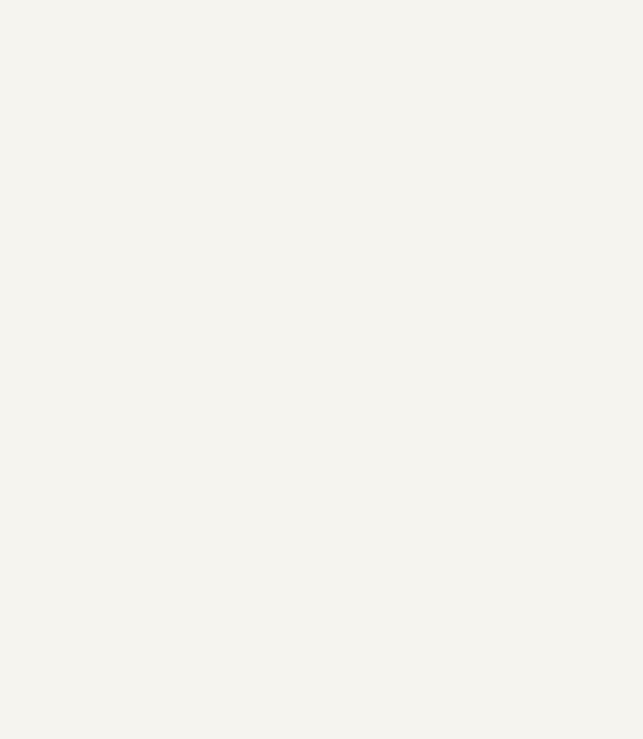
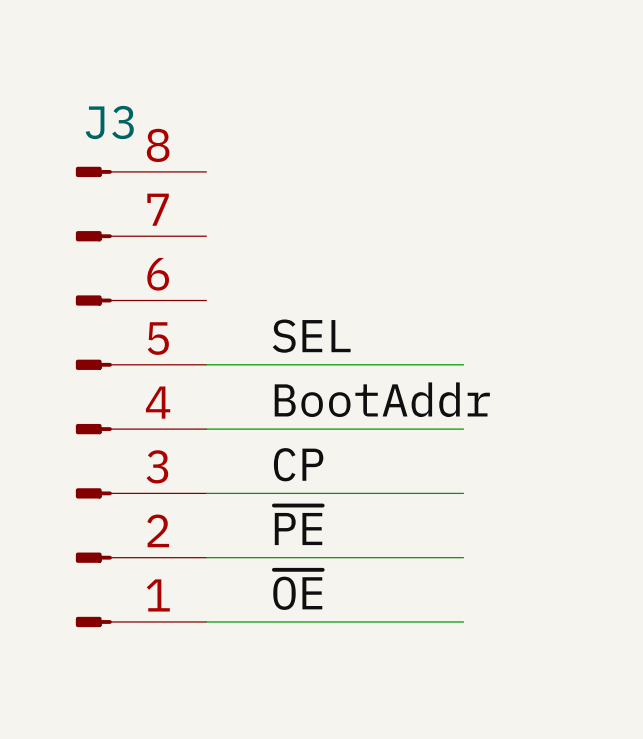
label: none -> SEL (311, 336)
wire: none -> (206, 364) (463, 364)
J3: none -> (141, 396)
label: none -> BootAddr (382, 399)
wire: none -> (206, 429) (463, 429)
label: none -> CP (298, 464)
wire: none -> (206, 493) (463, 493)
label: none -> ~{PE} (298, 525)
wire: none -> (206, 557) (463, 557)
label: none -> ~{OE} (297, 589)
wire: none -> (206, 621) (463, 621)

